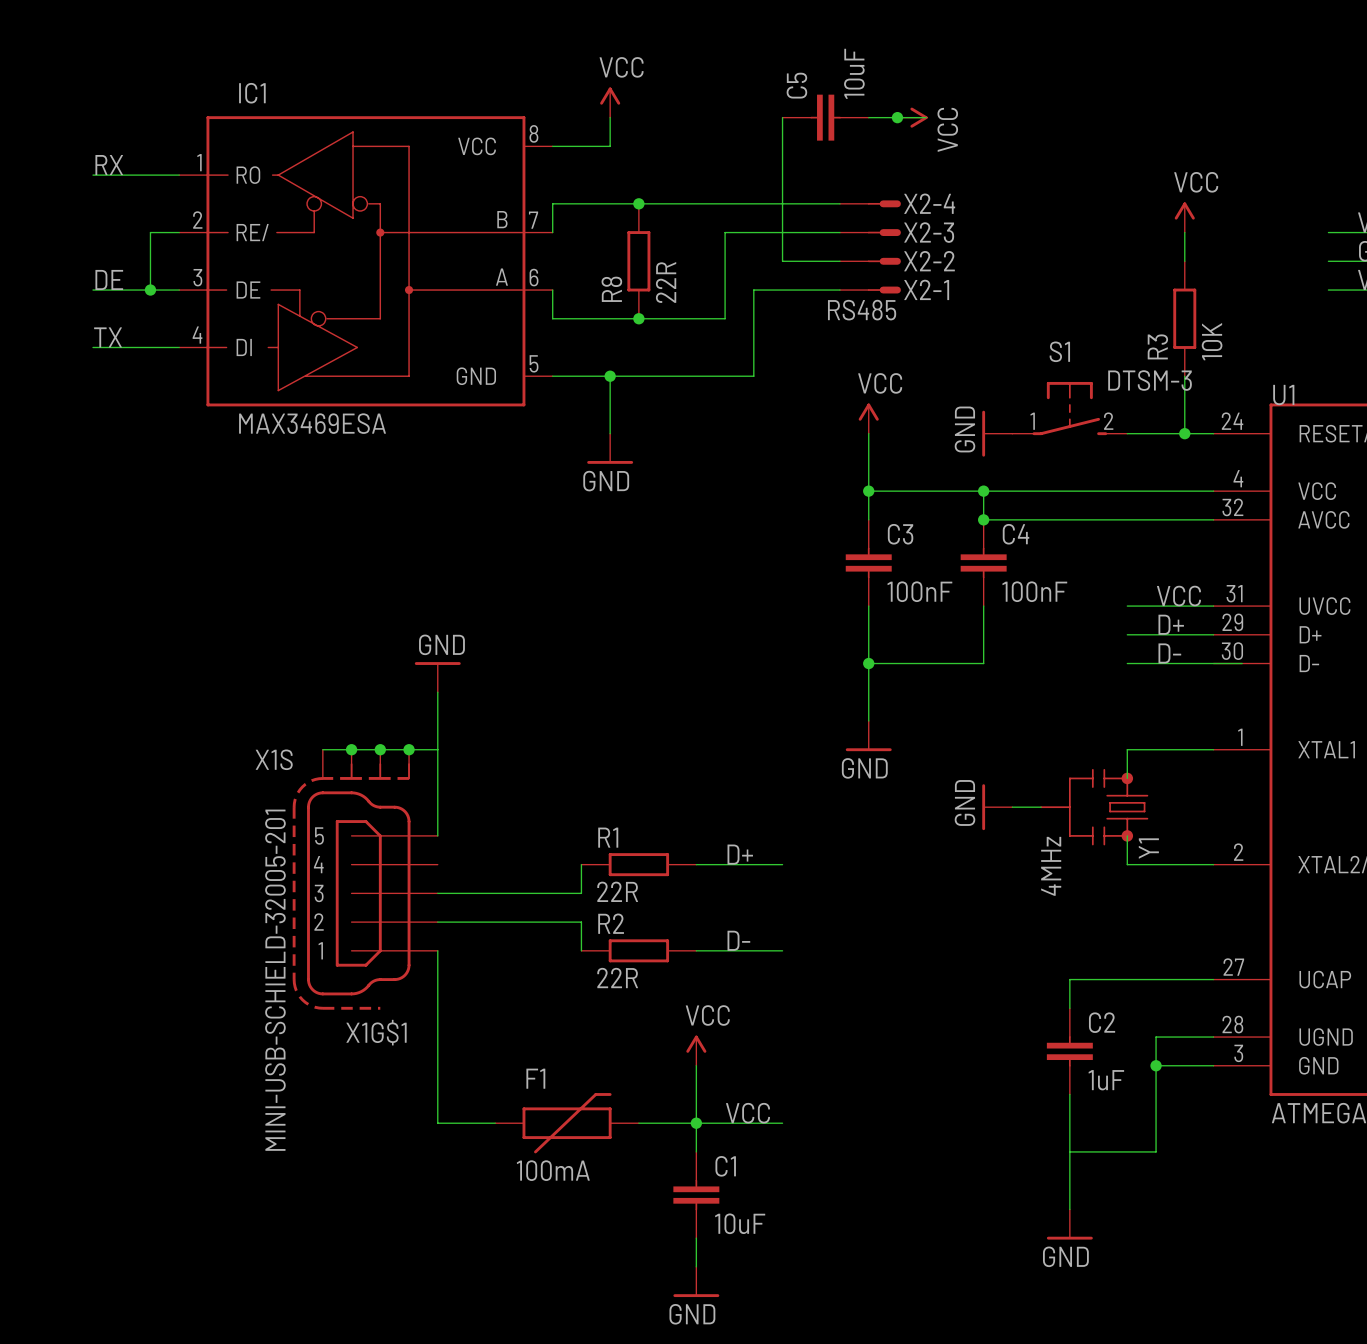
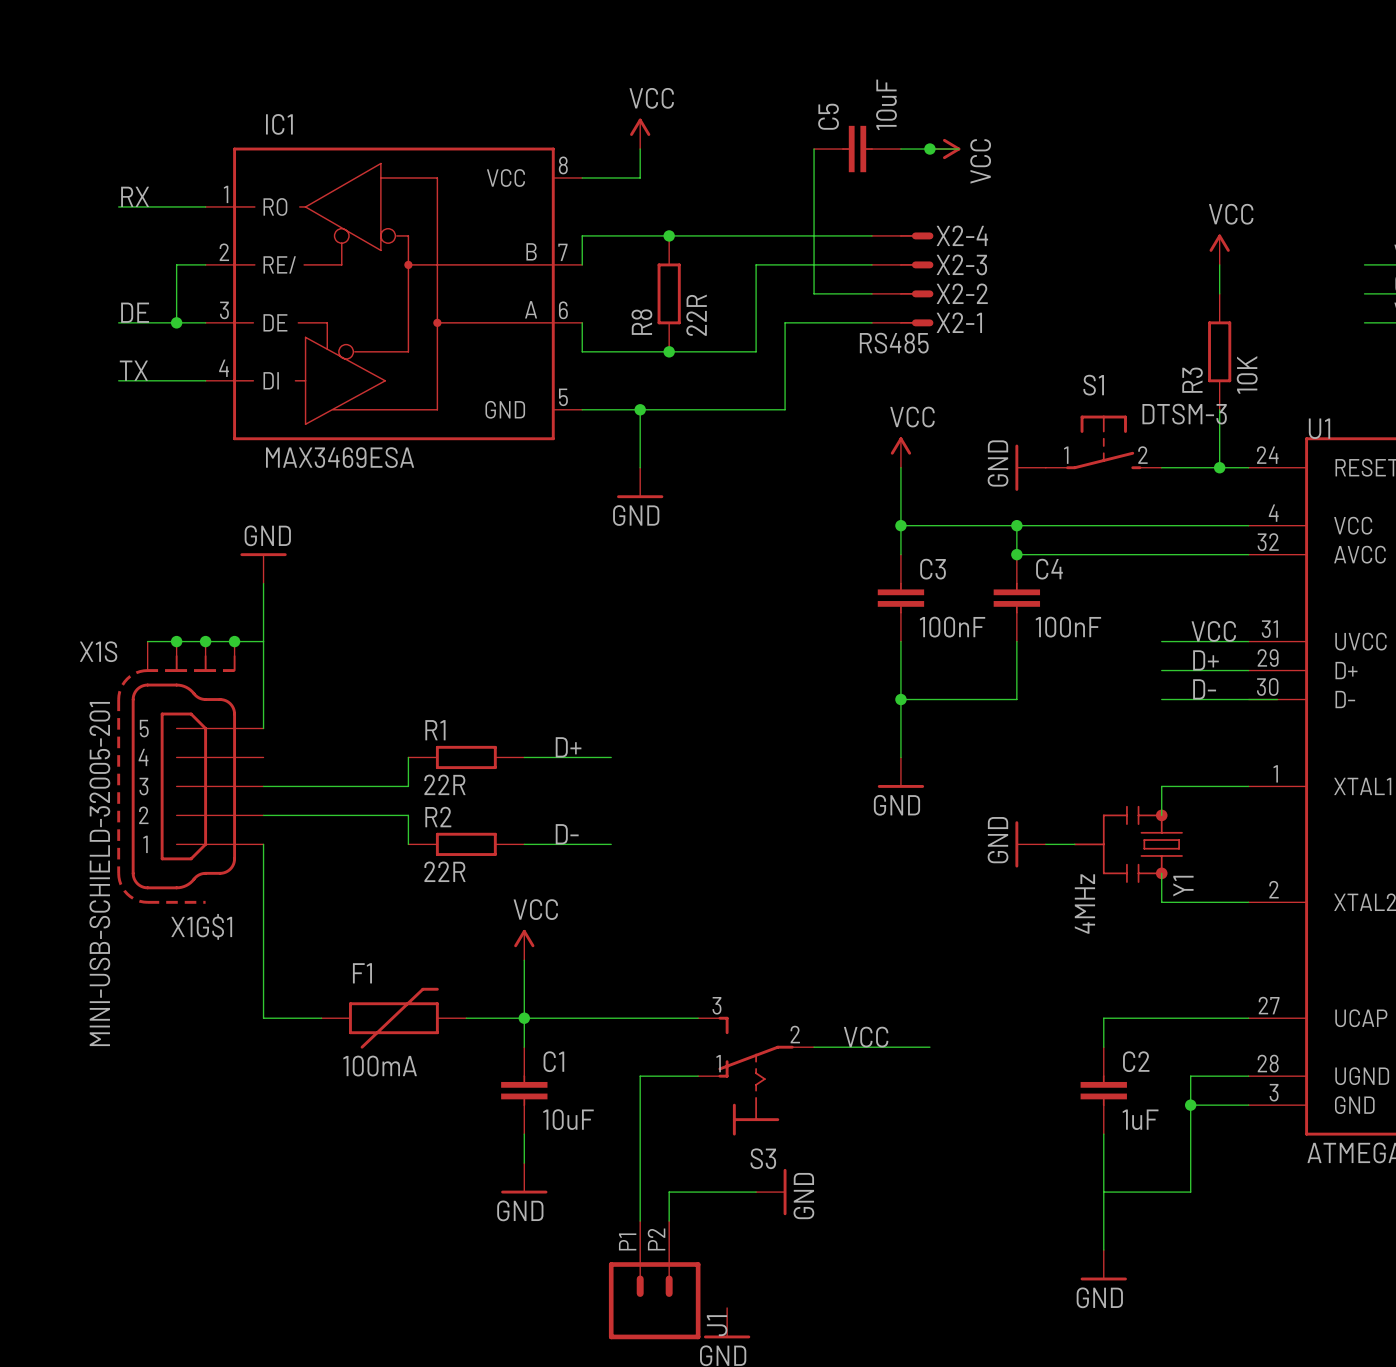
power symbol: none -> GND (263, 568)
wire: none -> (147, 641) (263, 641)
junction: none -> (176, 641)
junction: none -> (205, 641)
junction: none -> (234, 641)
power symbol: GND (437, 677) -> none
wire: (437, 692) (437, 835) -> (263, 583) (263, 728)
wire: none -> (263, 786) (350, 786)
junction: (351, 749) -> none
wire: (380, 749) (437, 749) -> (408, 786) (408, 757)
junction: (380, 749) -> none
junction: (409, 749) -> none
wire: none -> (263, 844) (263, 1018) (321, 1018)
label position: D+ (740, 854) -> D+ (568, 747)
wire: (581, 864) (581, 893) (437, 893) -> none
R1 position: (638, 864) -> (466, 757)
wire: (696, 864) (782, 864) -> (524, 757) (611, 757)
X1S position: (351, 879) -> (176, 772)
X1G$1 position: (372, 893) -> (197, 786)
wire: (437, 922) (581, 922) (581, 950) -> (263, 815) (408, 815) (408, 844)
label position: D- (738, 940) -> D- (567, 834)
wire: (437, 950) (437, 1123) (495, 1123) -> (524, 1134) (524, 1163)
R2 position: (638, 950) -> (466, 844)
wire: (696, 950) (782, 950) -> (524, 844) (611, 844)
wire: none -> (466, 1018) (698, 1018)
junction: none -> (524, 1018)
wire: none -> (814, 1047) (929, 1047)
wire: none -> (698, 1076) (640, 1076) (640, 1221)
S3: none -> (756, 1076)
power symbol position: VCC (696, 1050) -> VCC (524, 945)
wire: (696, 1065) (696, 1151) -> (524, 960) (524, 1047)
label position: VCC (748, 1113) -> VCC (866, 1037)
F1 position: (567, 1123) -> (393, 1018)
wire: (638, 1123) (782, 1123) -> none
junction: (696, 1123) -> none
power symbol: none -> GND (524, 1178)
wire: none -> (756, 1192) (669, 1192) (669, 1221)
power symbol: none -> GND (771, 1192)
C1 position: (696, 1195) -> (524, 1090)
wire: (696, 1238) (696, 1266) -> none
J1: none -> (654, 1280)

